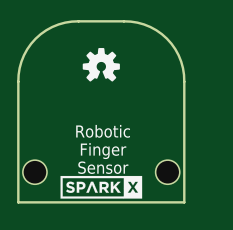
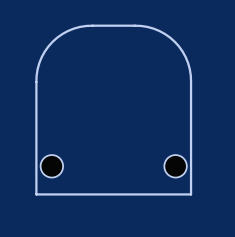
drawing: [82, 48, 120, 82] -> none
text: Robotic (103, 131) -> none
text: Finger (103, 151) -> none
text: Sensor (103, 167) -> none
drawing: [60, 175, 143, 199] -> none

